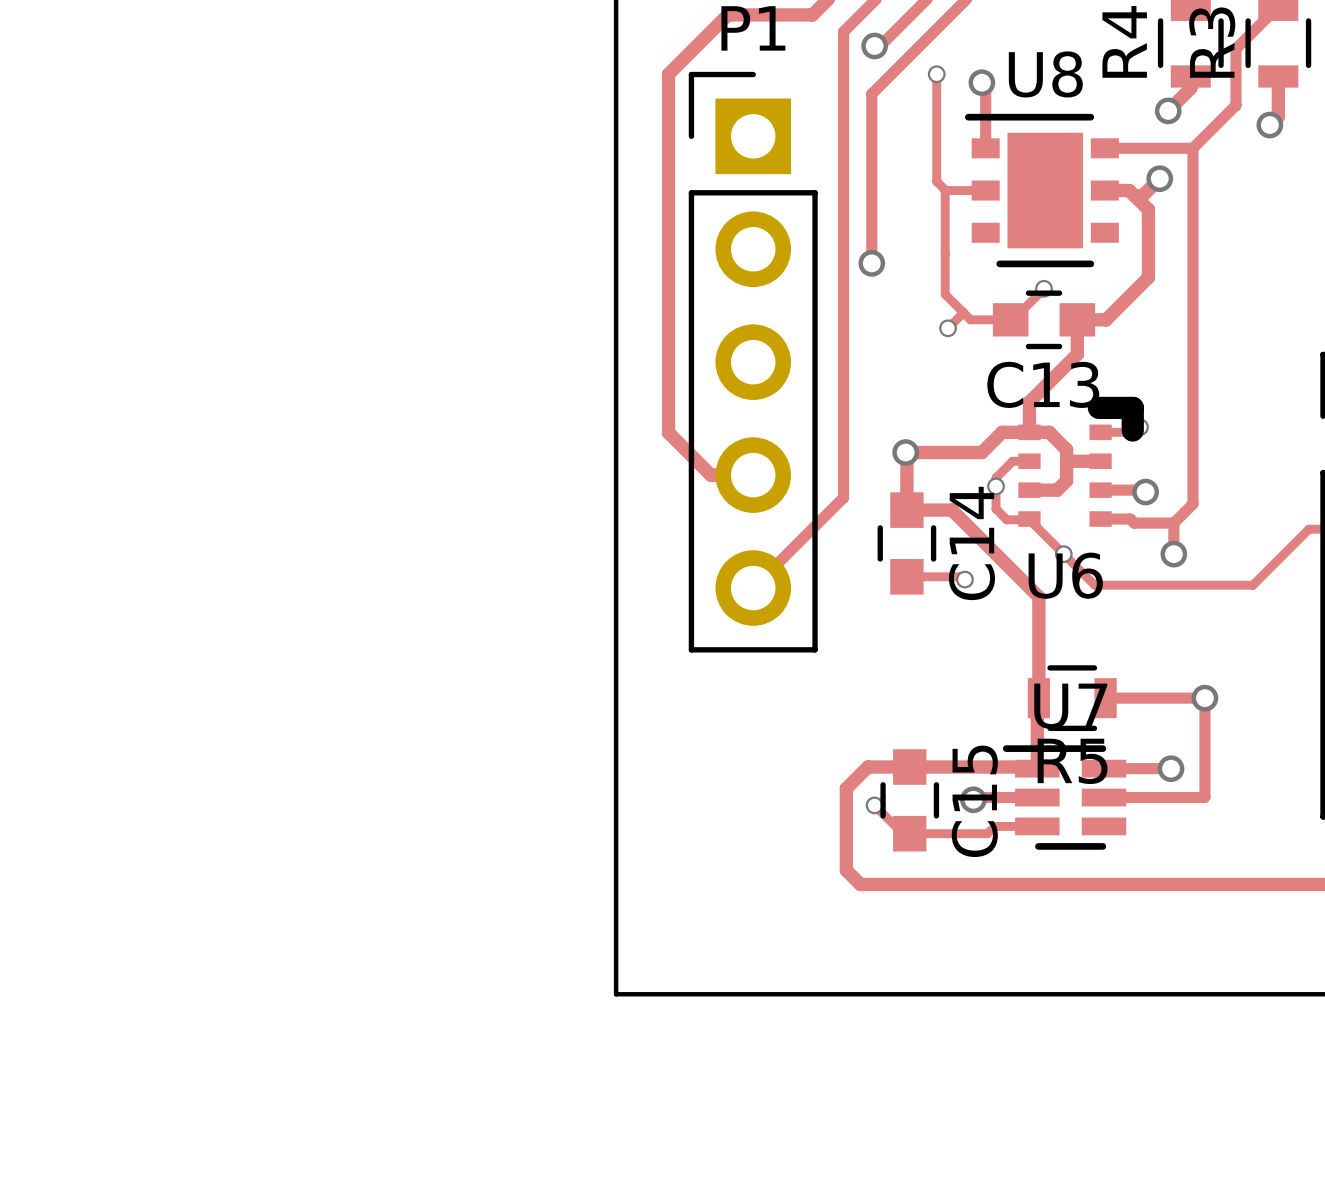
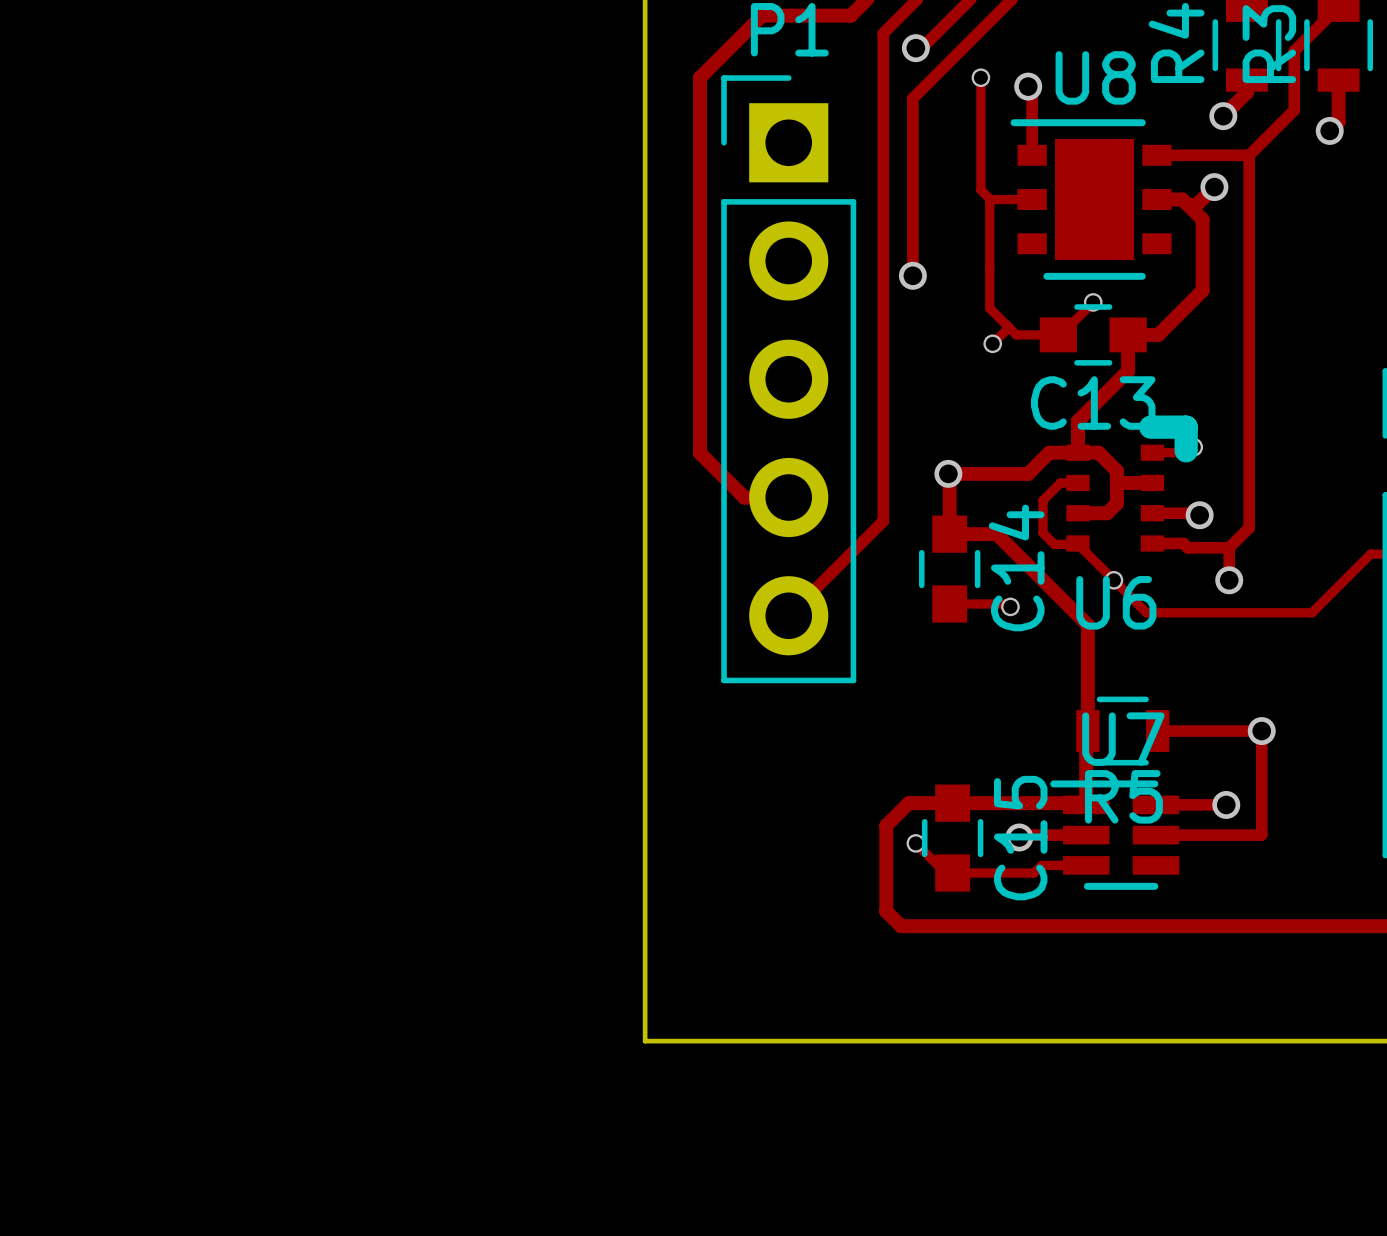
via: (996, 486) -> none

